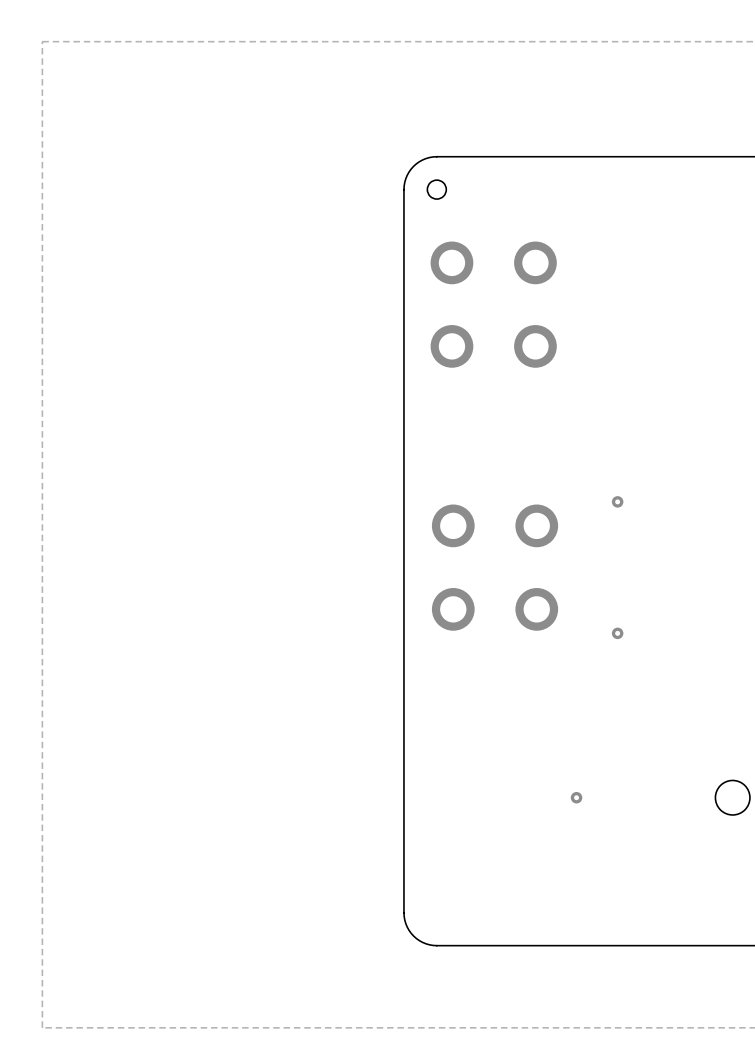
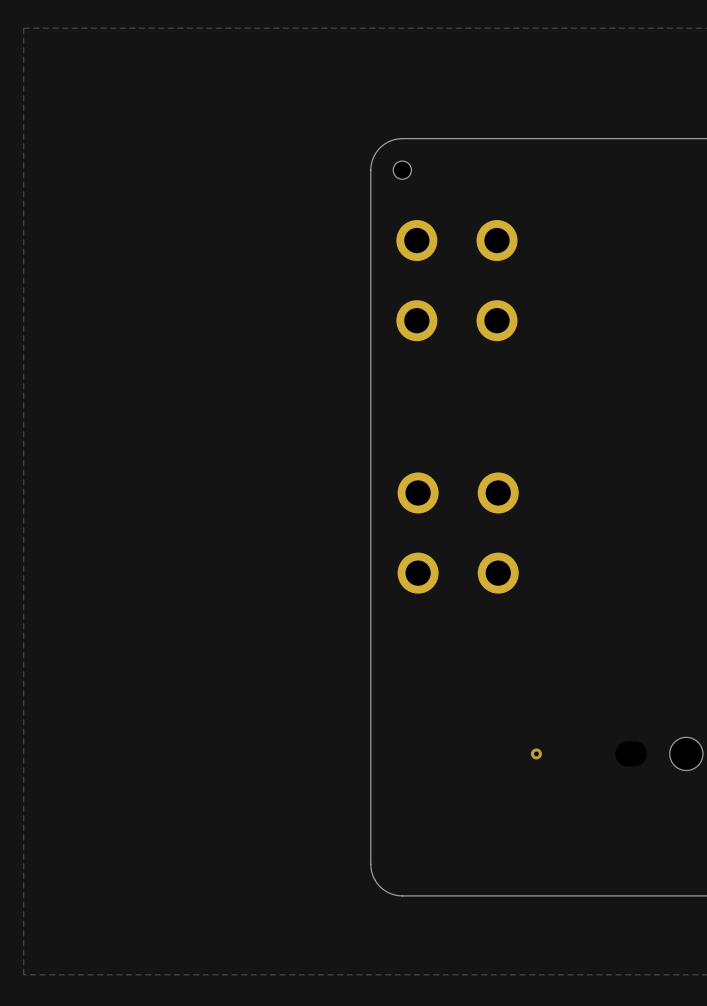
via: (617, 501) -> none
via: (617, 633) -> none

